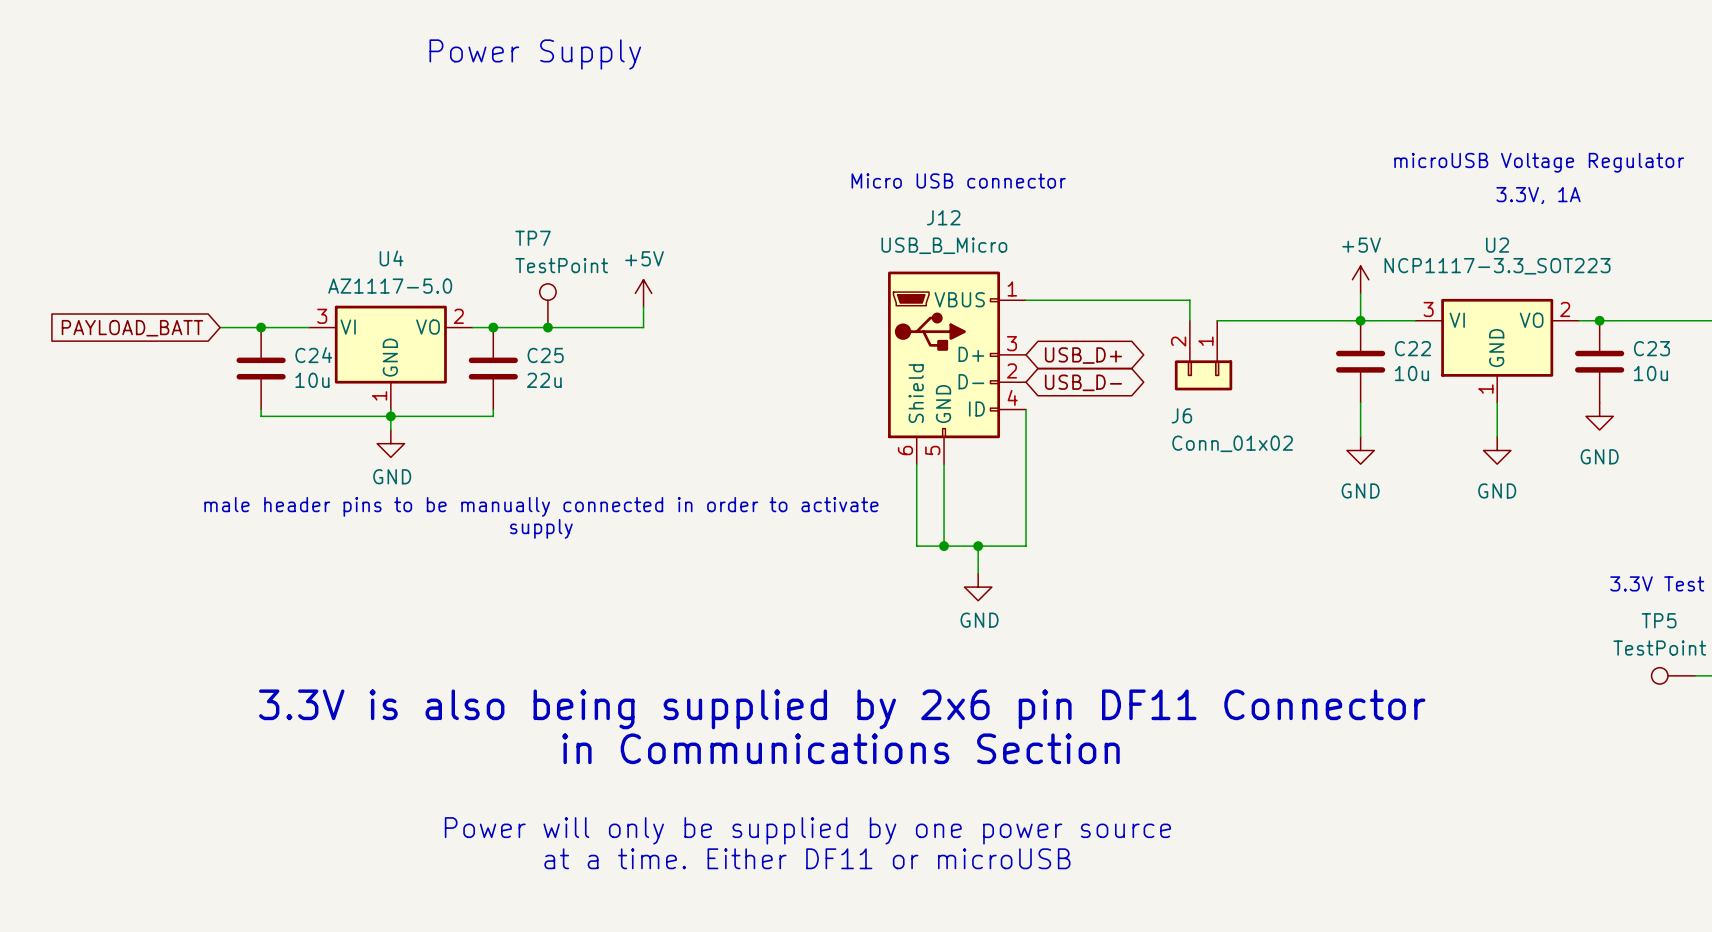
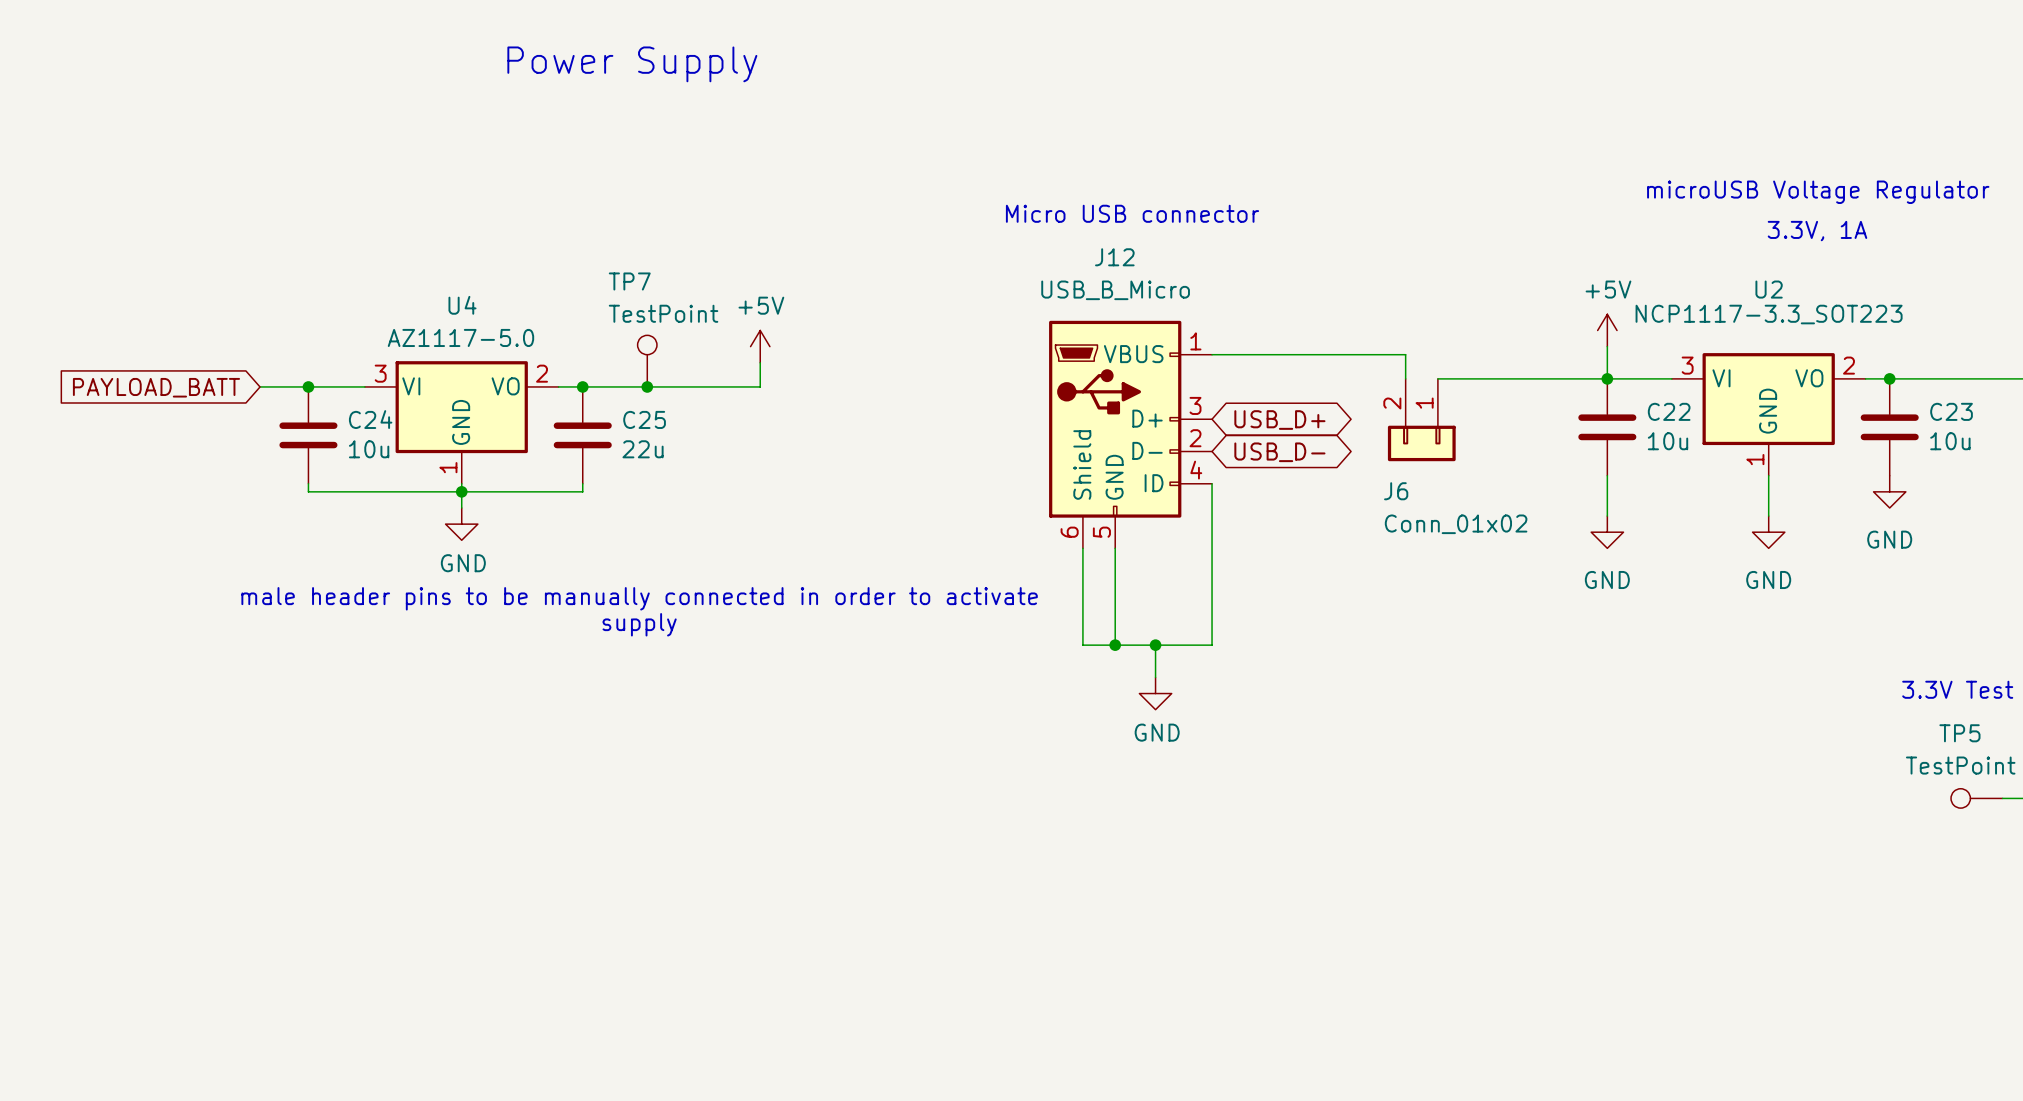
text: 3.3V is also being supplied by 2x6 pin DF11 Connector (842, 709) -> none
text: in Communications Section (840, 748) -> none
text: Power will only be supplied by one power source (807, 830) -> none
text: at a time. Either DF11 or microUSB (807, 858) -> none

